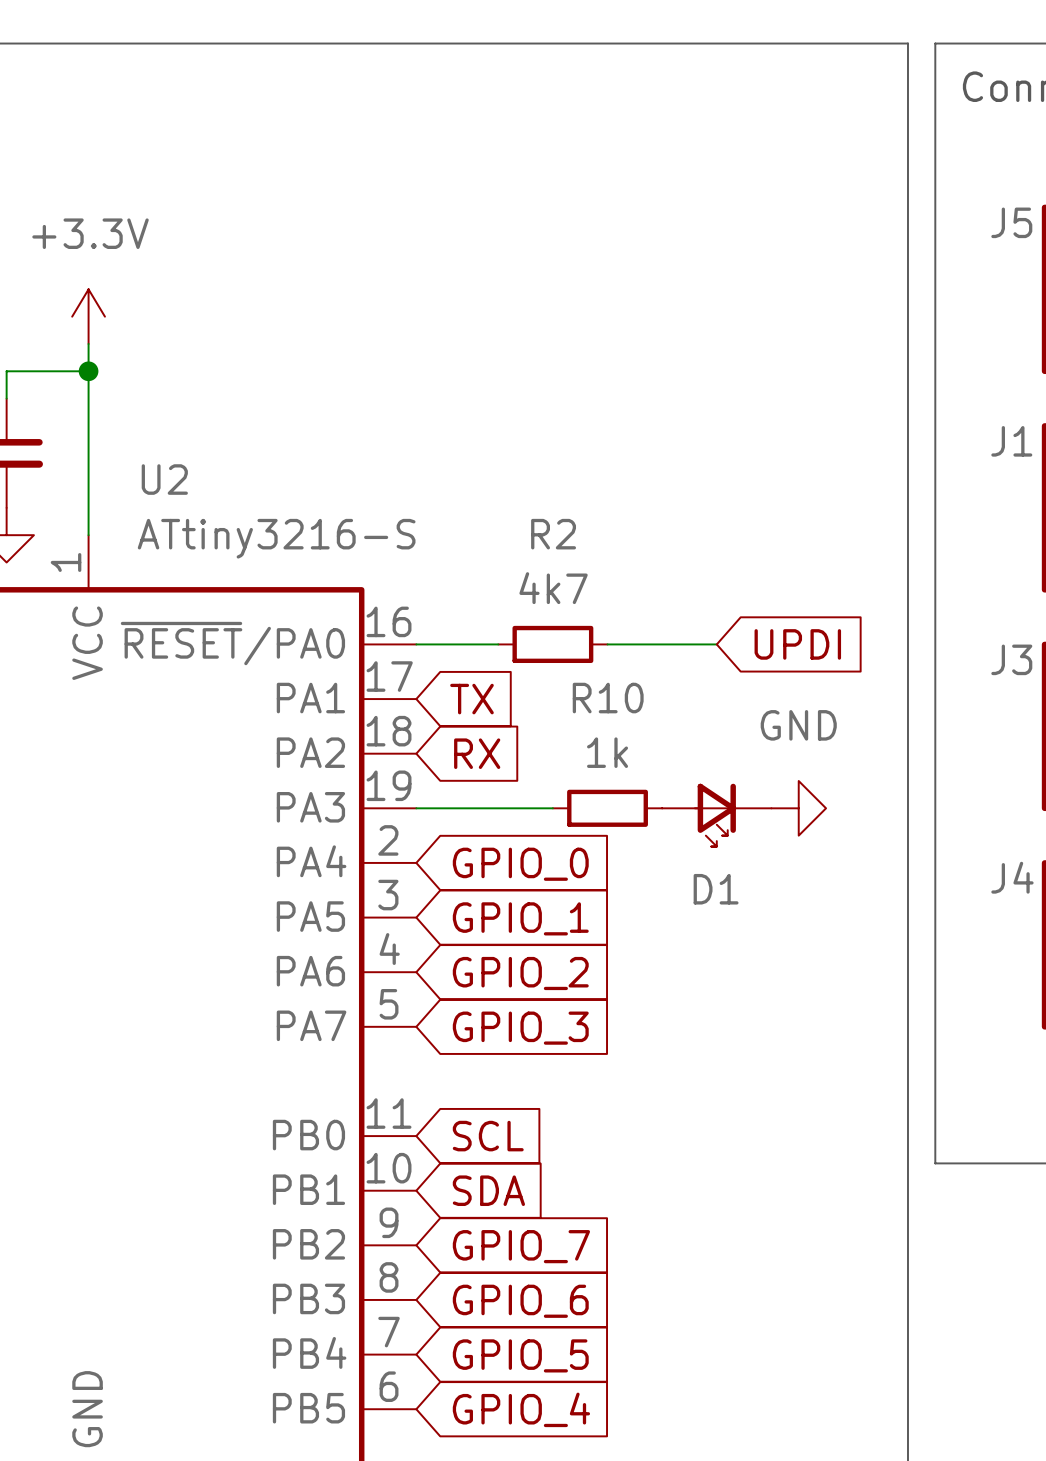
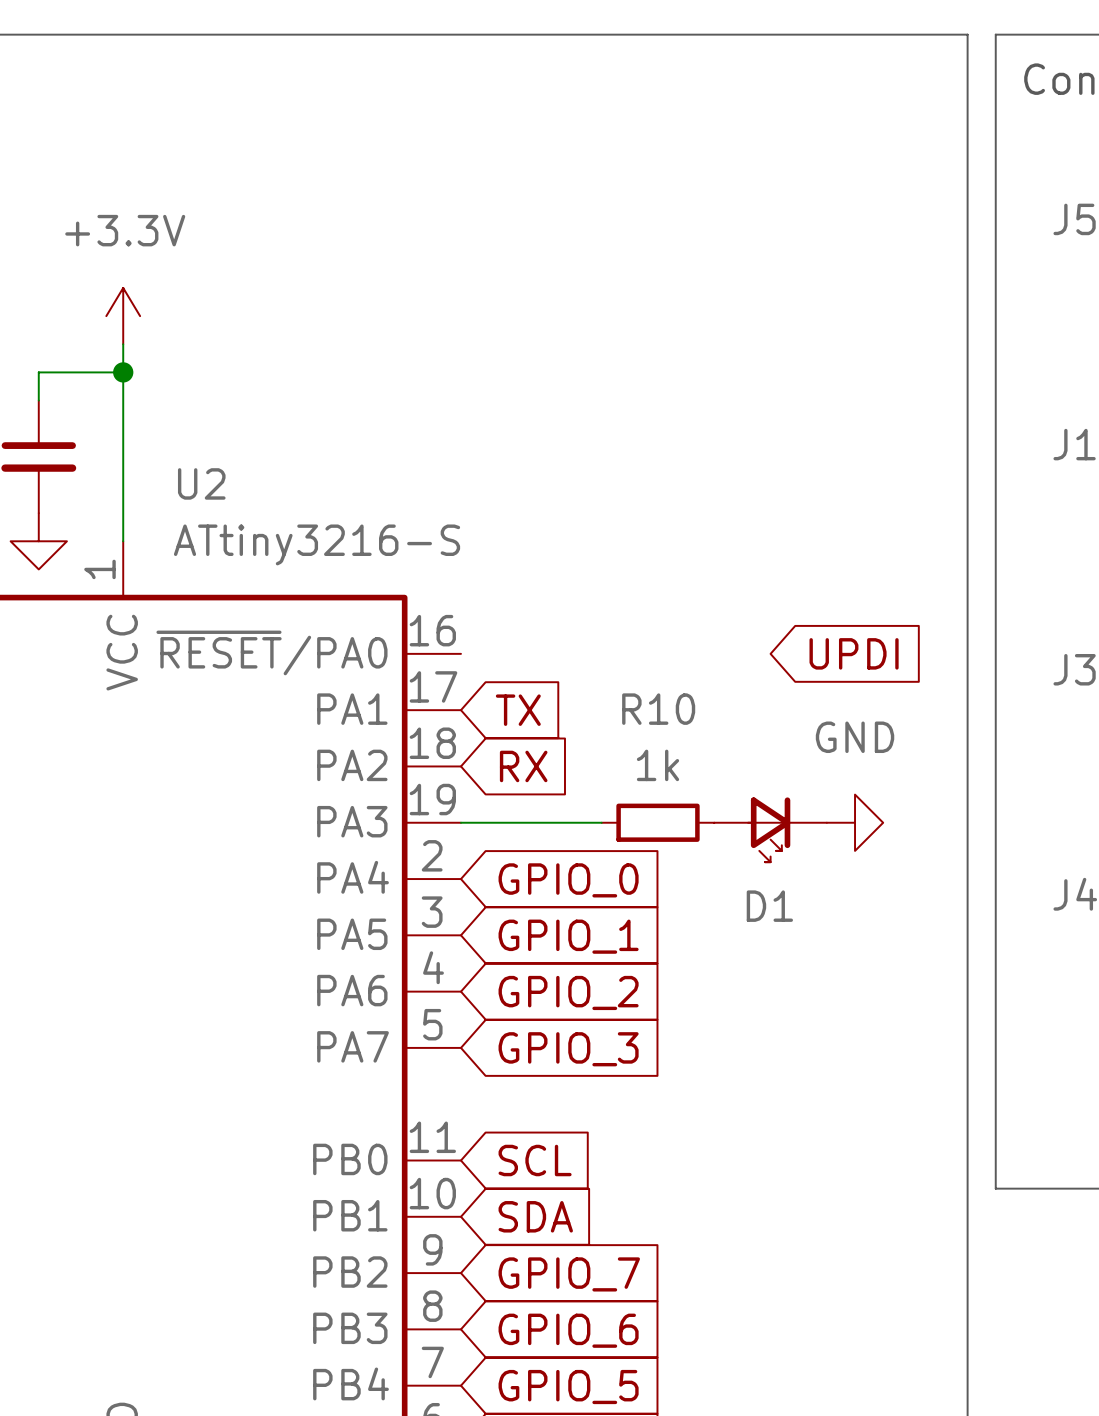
wire: (416, 644) (498, 644) -> none
R2: 4k7 (552, 644) -> none
wire: (607, 644) (716, 644) -> none

